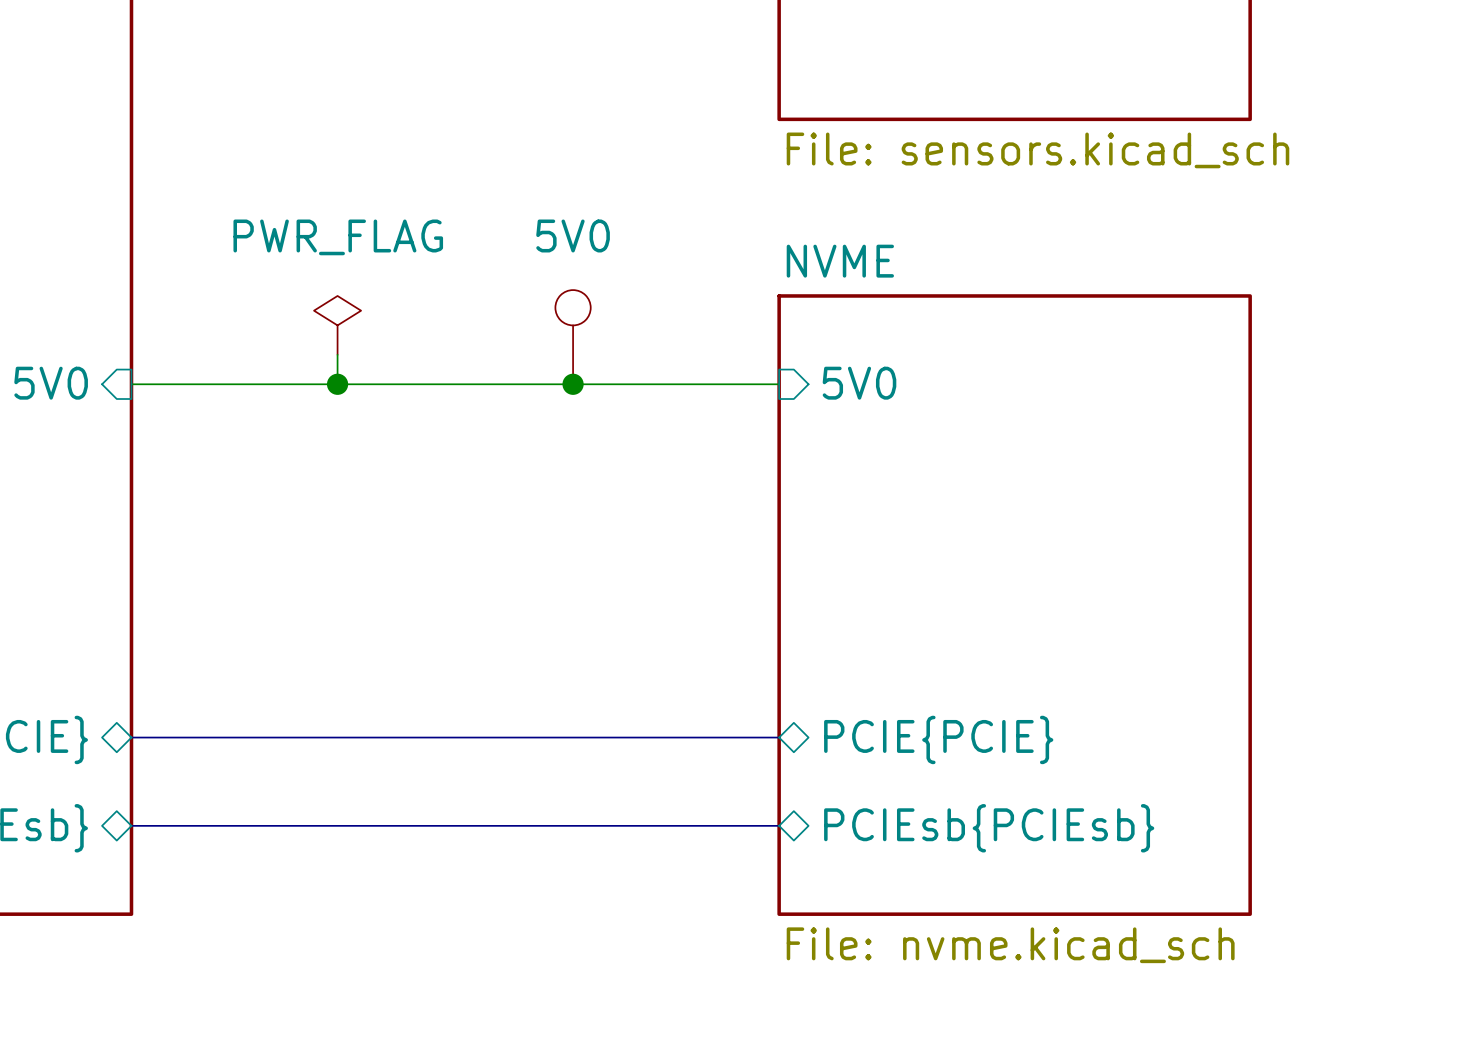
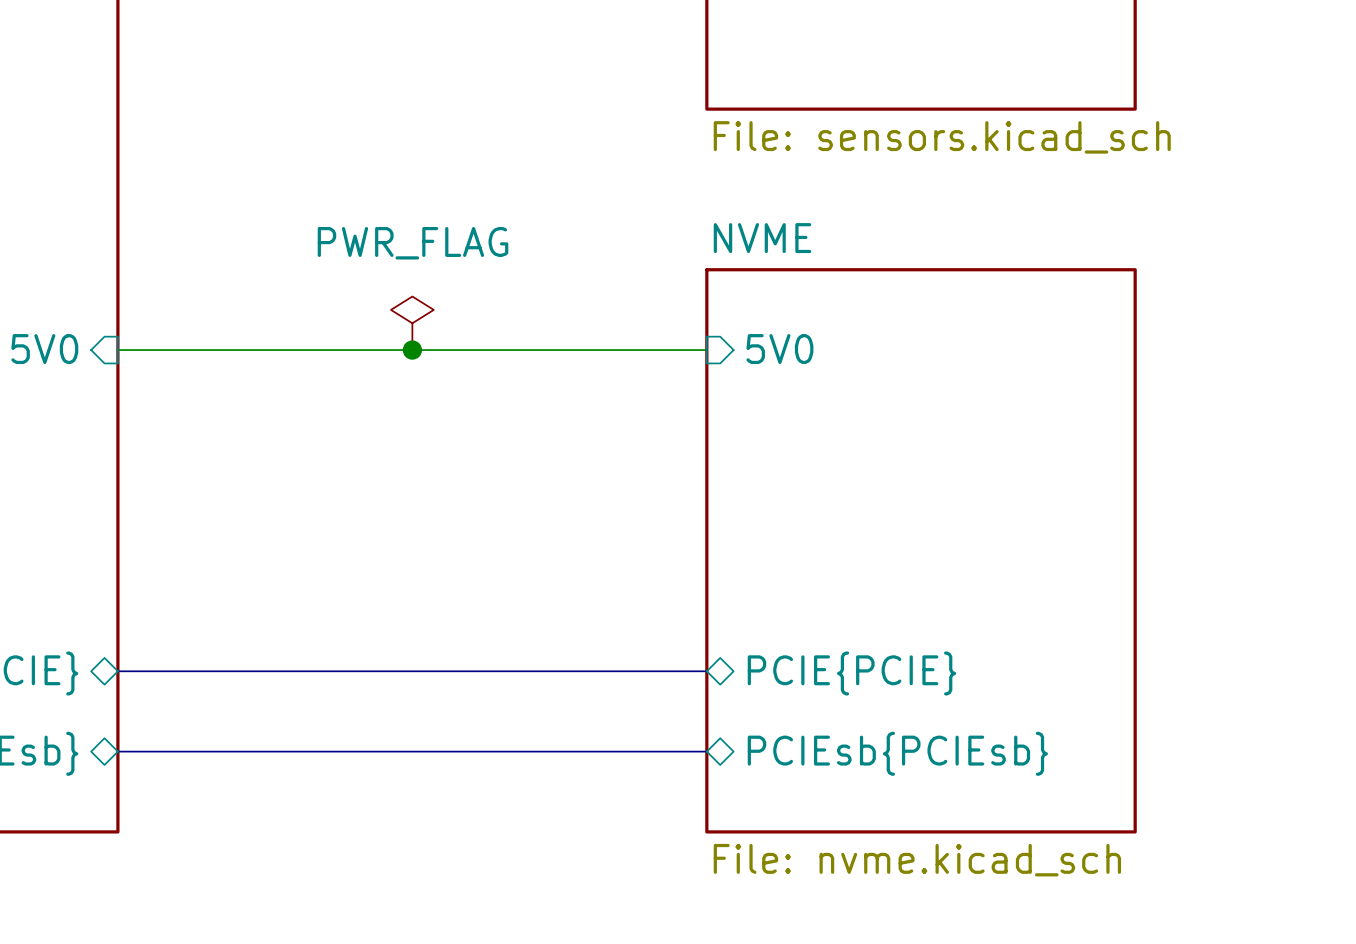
power symbol position: PWR_FLAG (337, 325) -> PWR_FLAG (412, 323)
5V0: (573, 337) -> none
wire: (337, 354) (337, 384) -> none
junction: (337, 384) -> none
junction: none -> (412, 350)
junction: (573, 384) -> none

